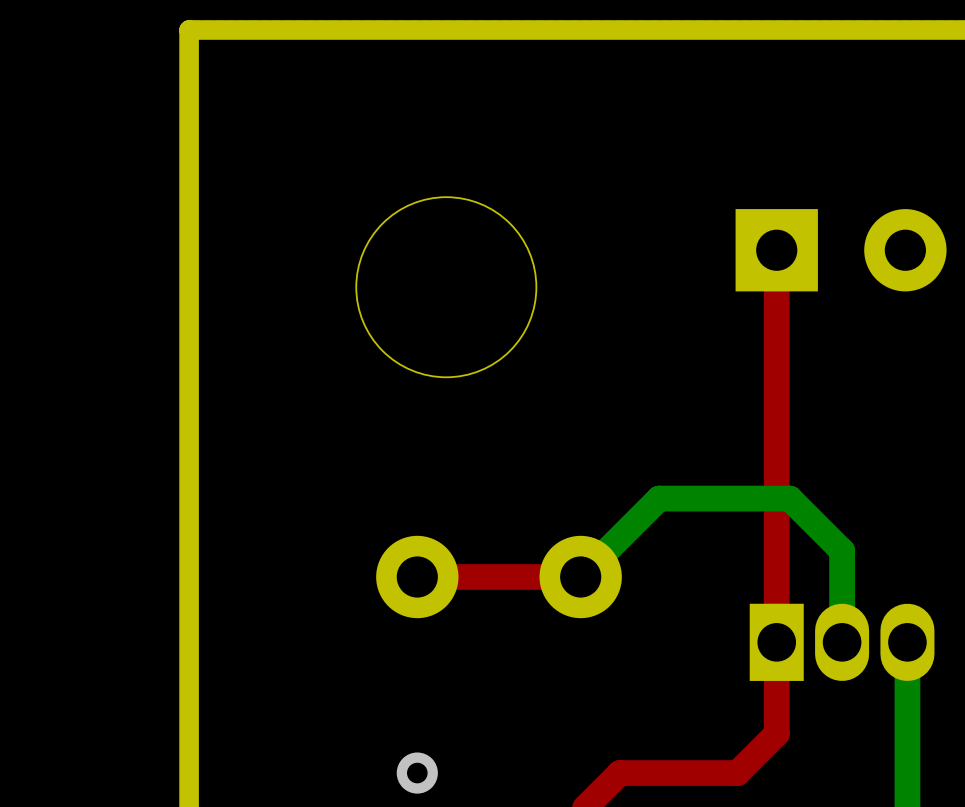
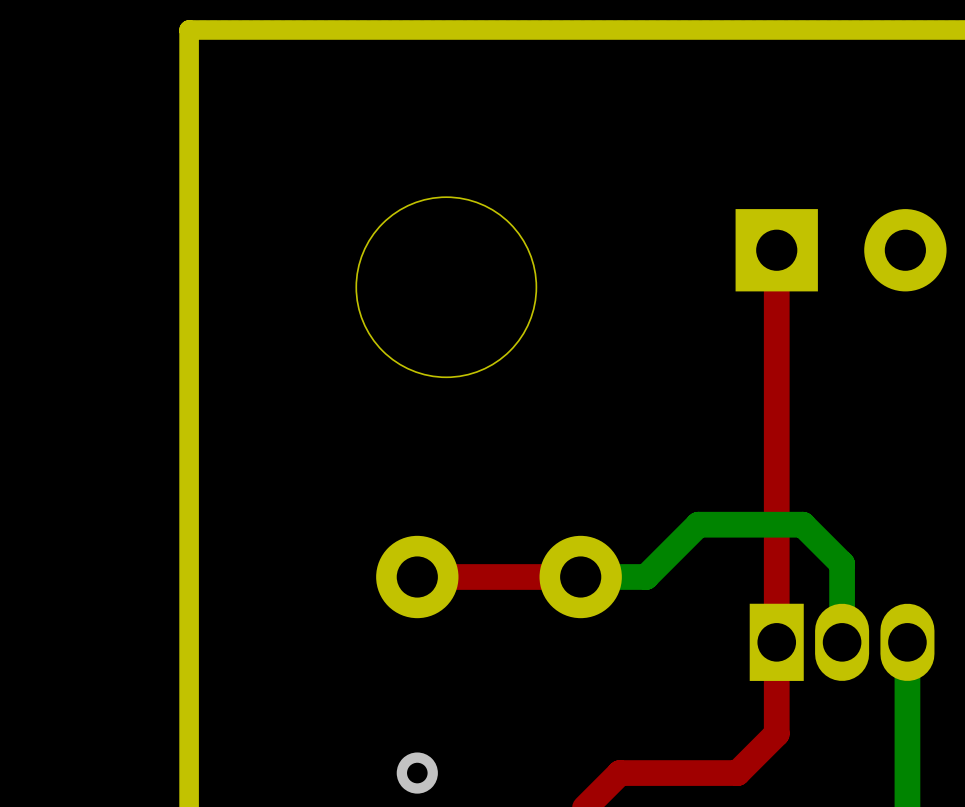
bottom track: (842, 563) (842, 550) (789, 498) (659, 498) (580, 577) -> (842, 563) (802, 524) (698, 524) (646, 577) (580, 577)

